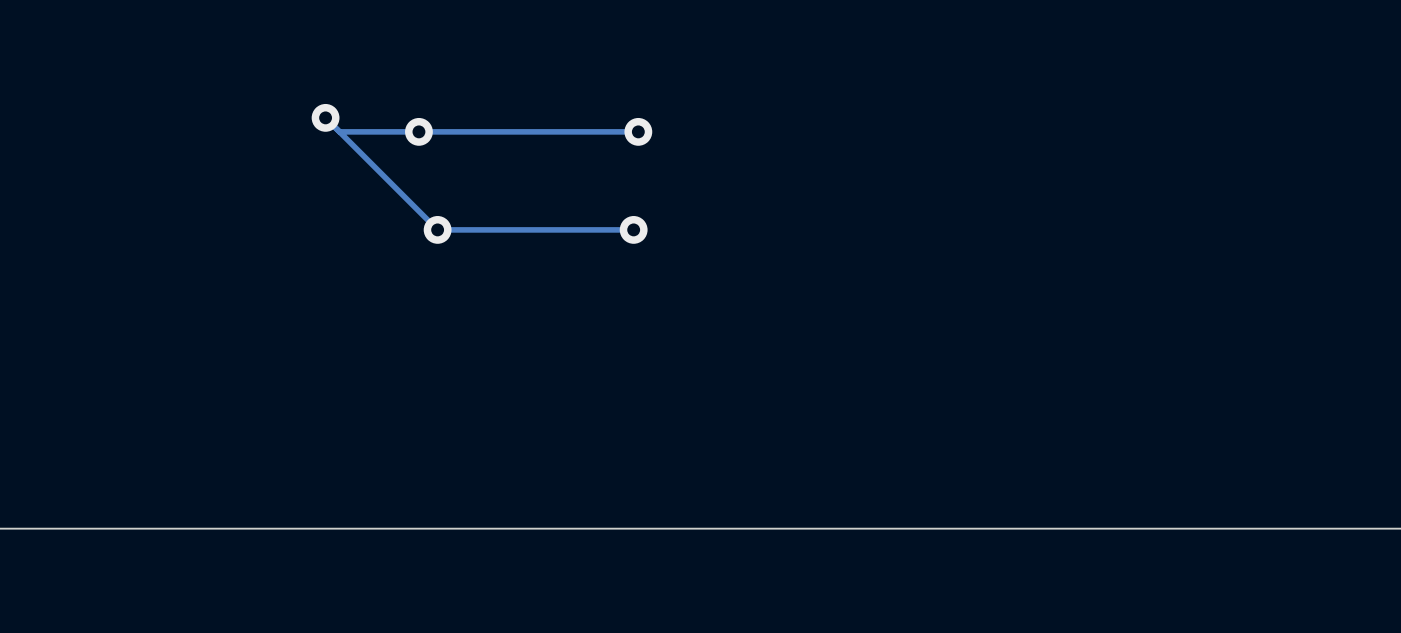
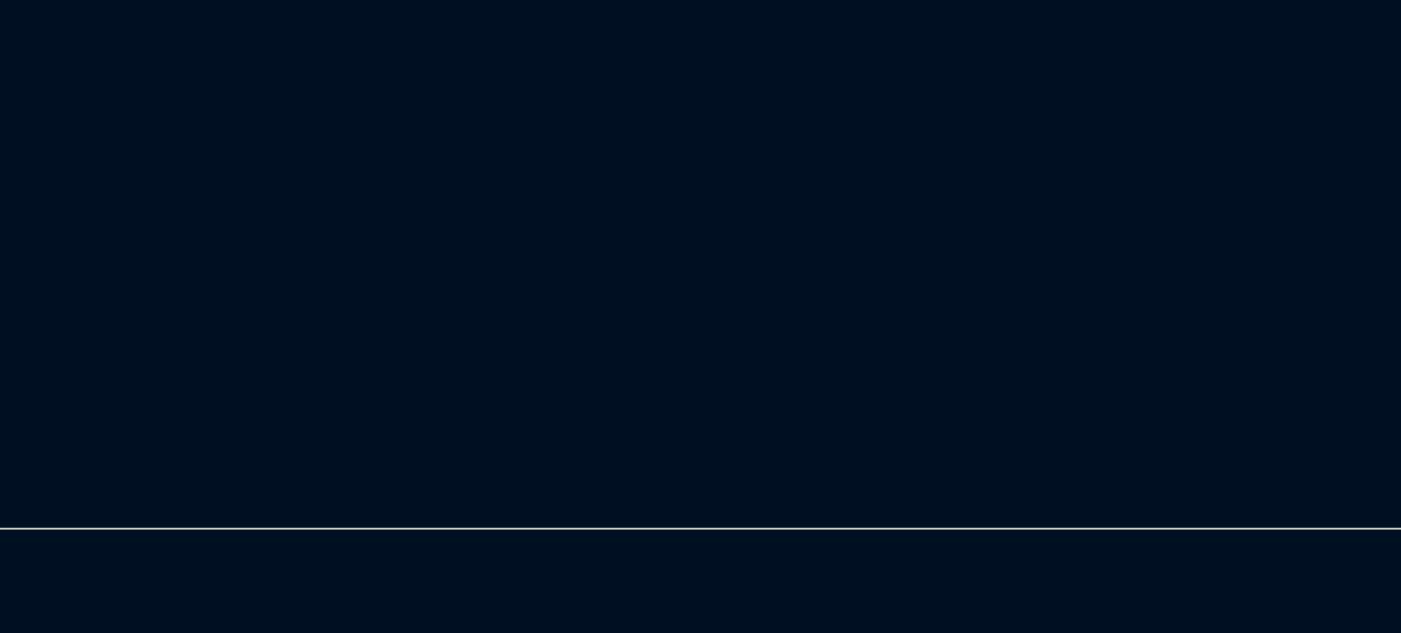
track: (325, 117) (437, 229) (633, 229) -> none
via: (325, 117) -> none
via: (418, 131) -> none
track: (638, 131) (339, 131) -> none
via: (638, 131) -> none
via: (437, 229) -> none
via: (633, 229) -> none

